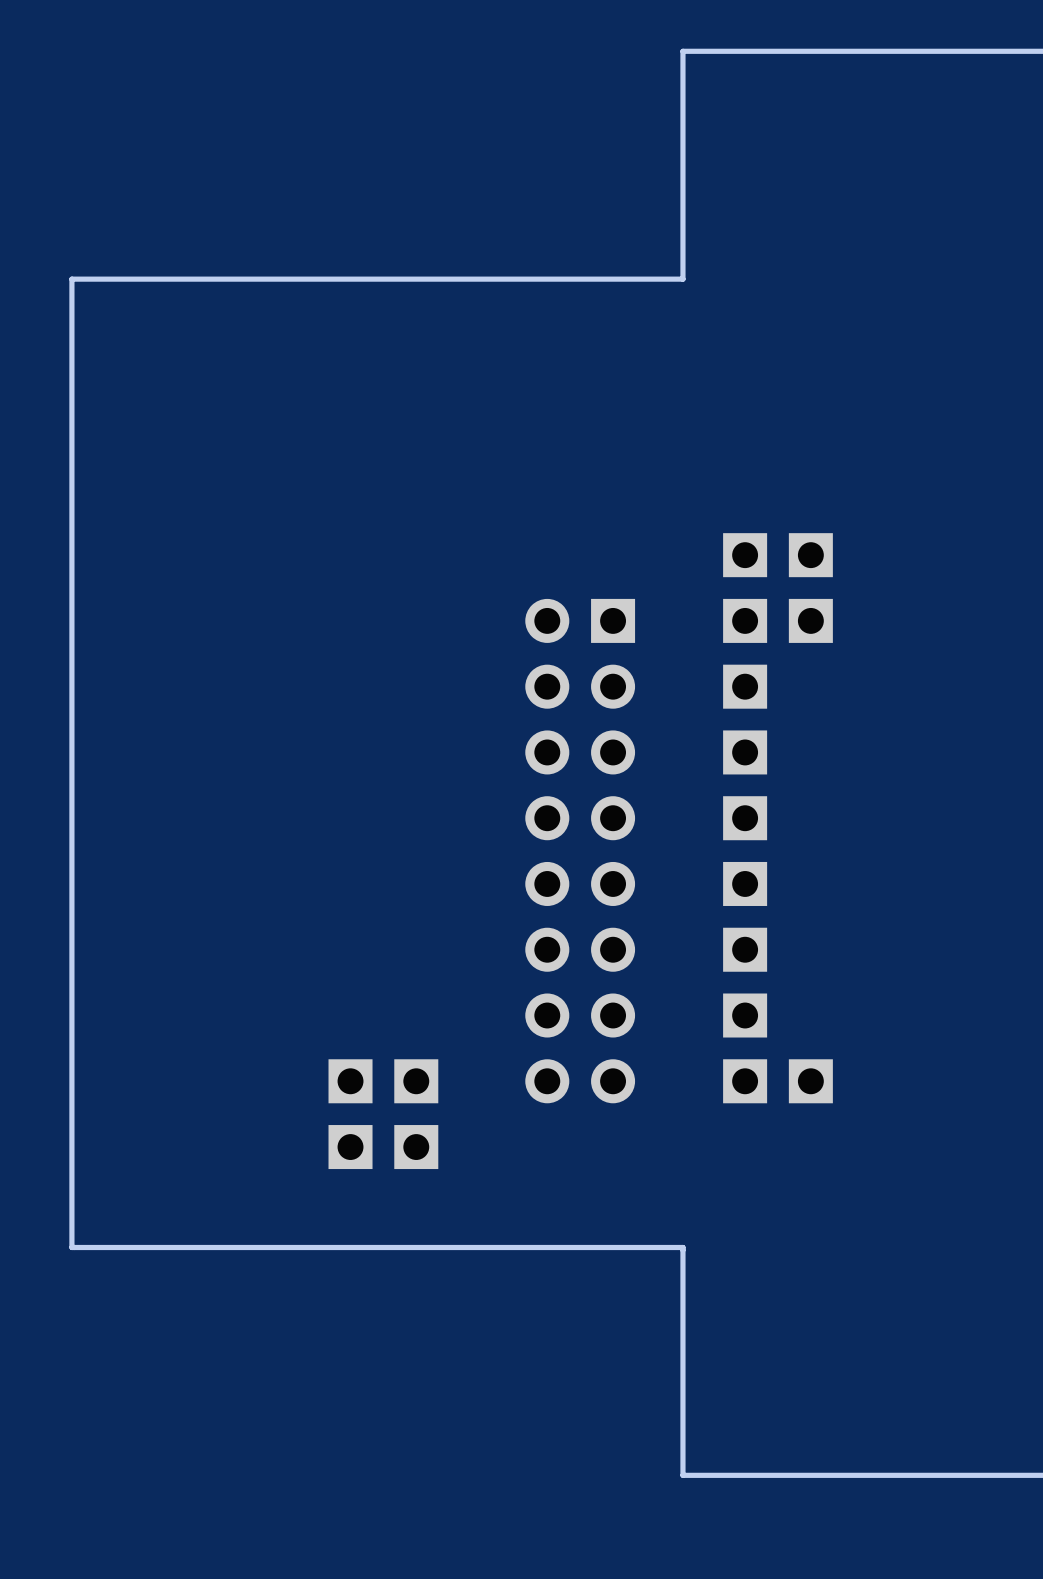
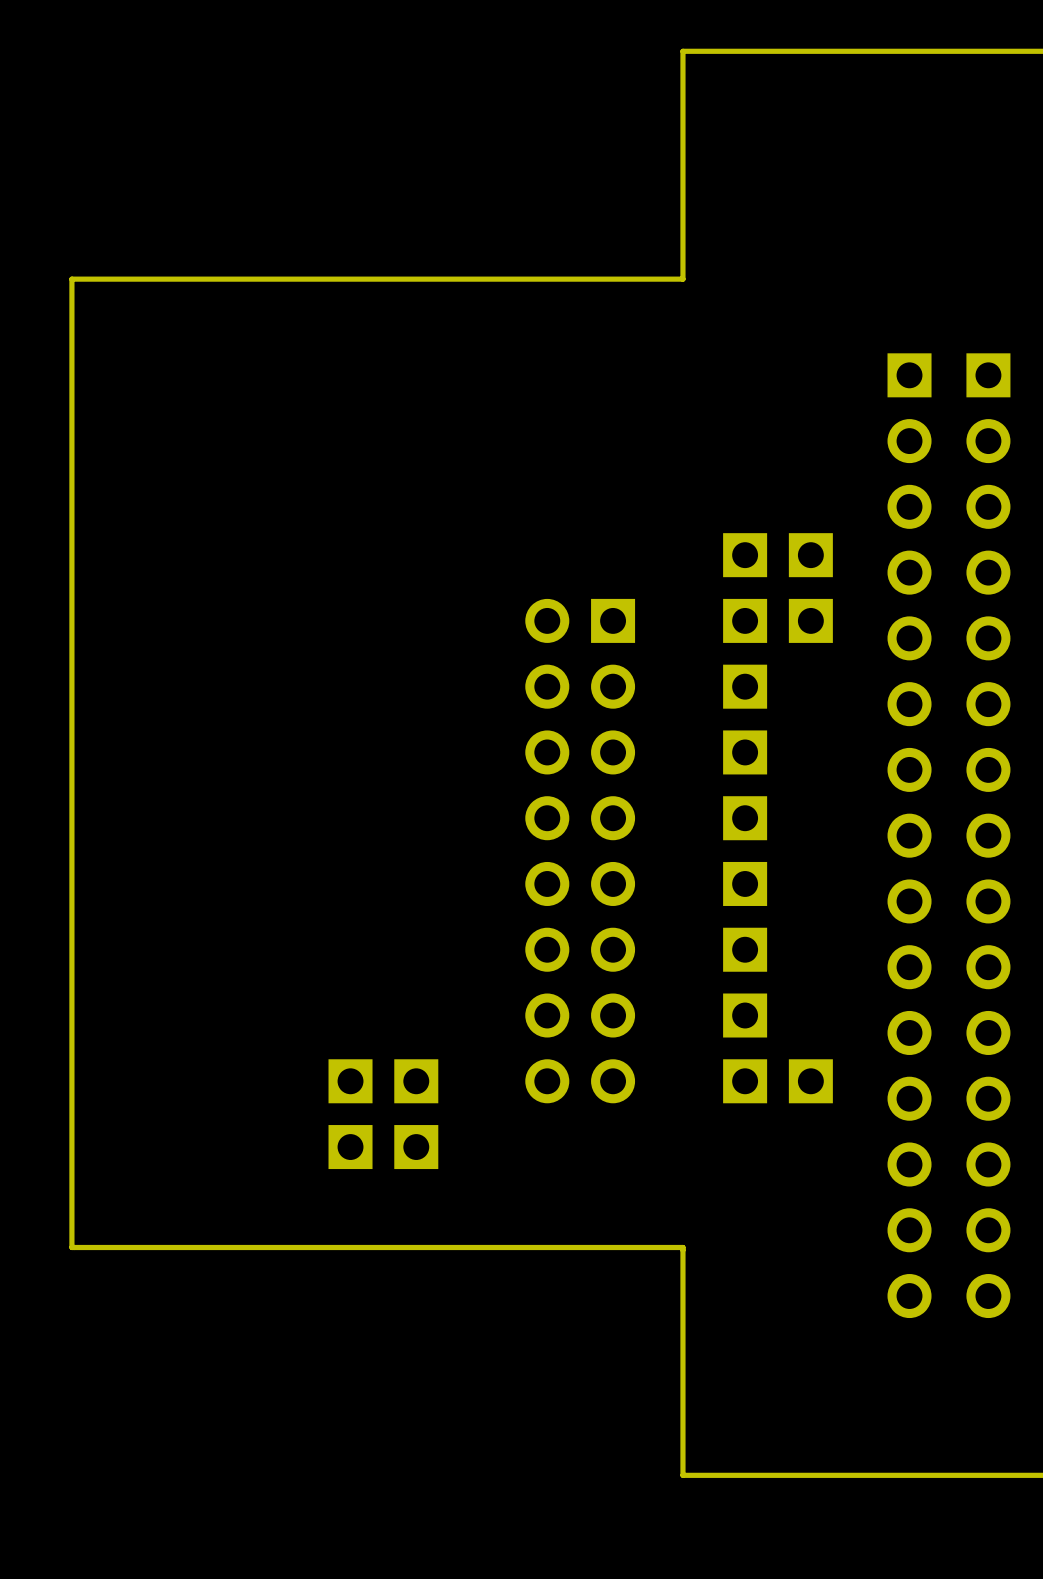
part: none -> (909, 835)
part: none -> (988, 835)

